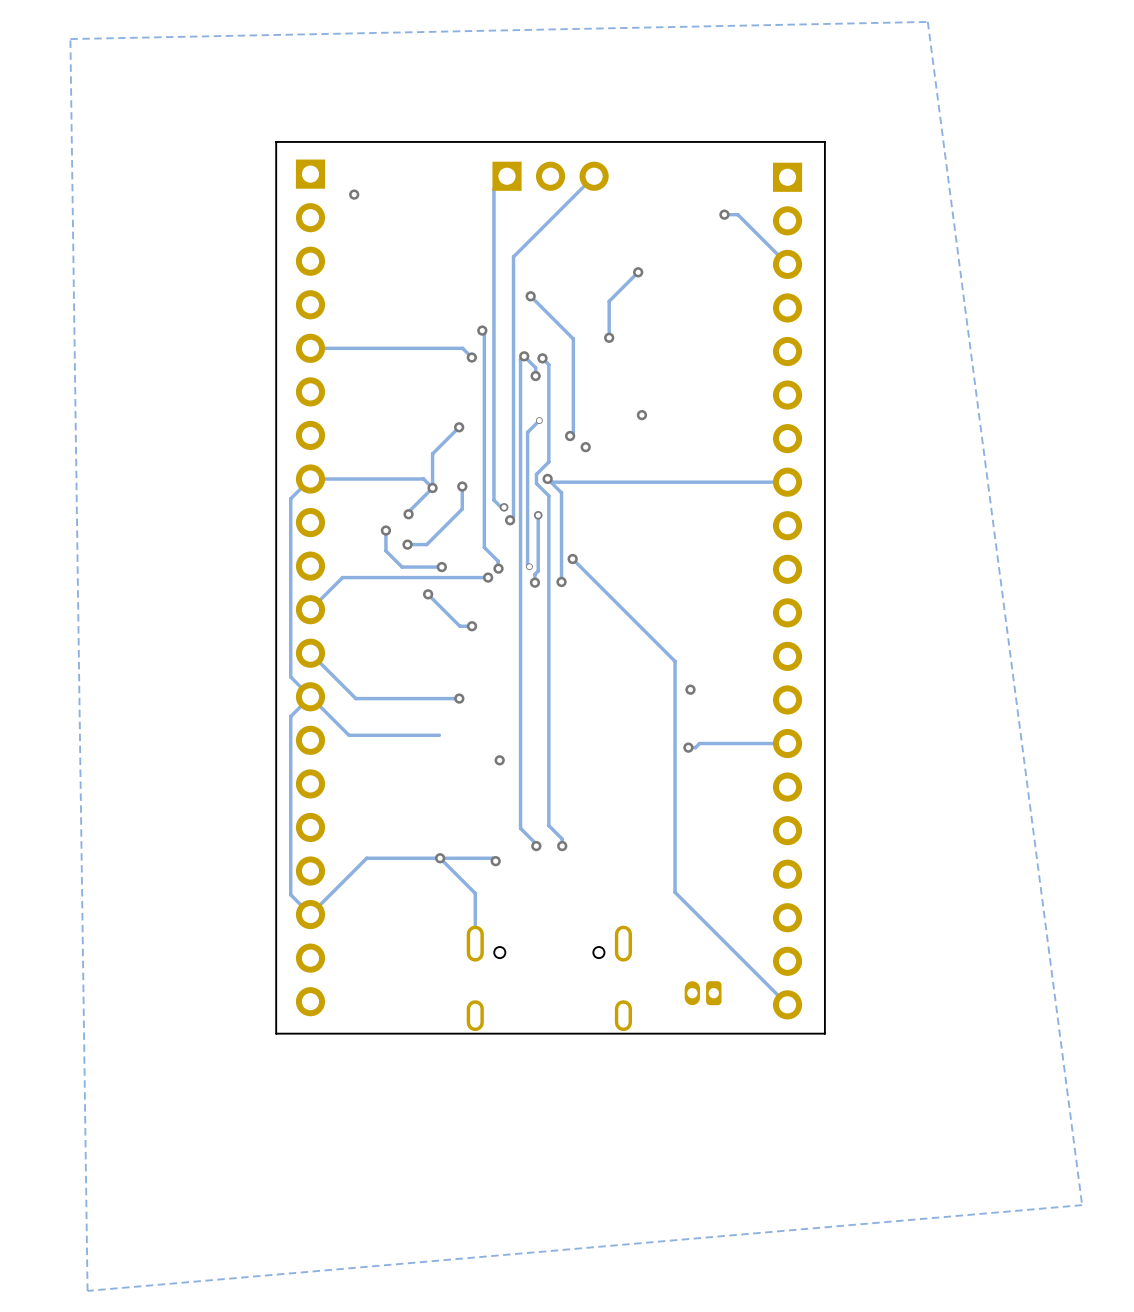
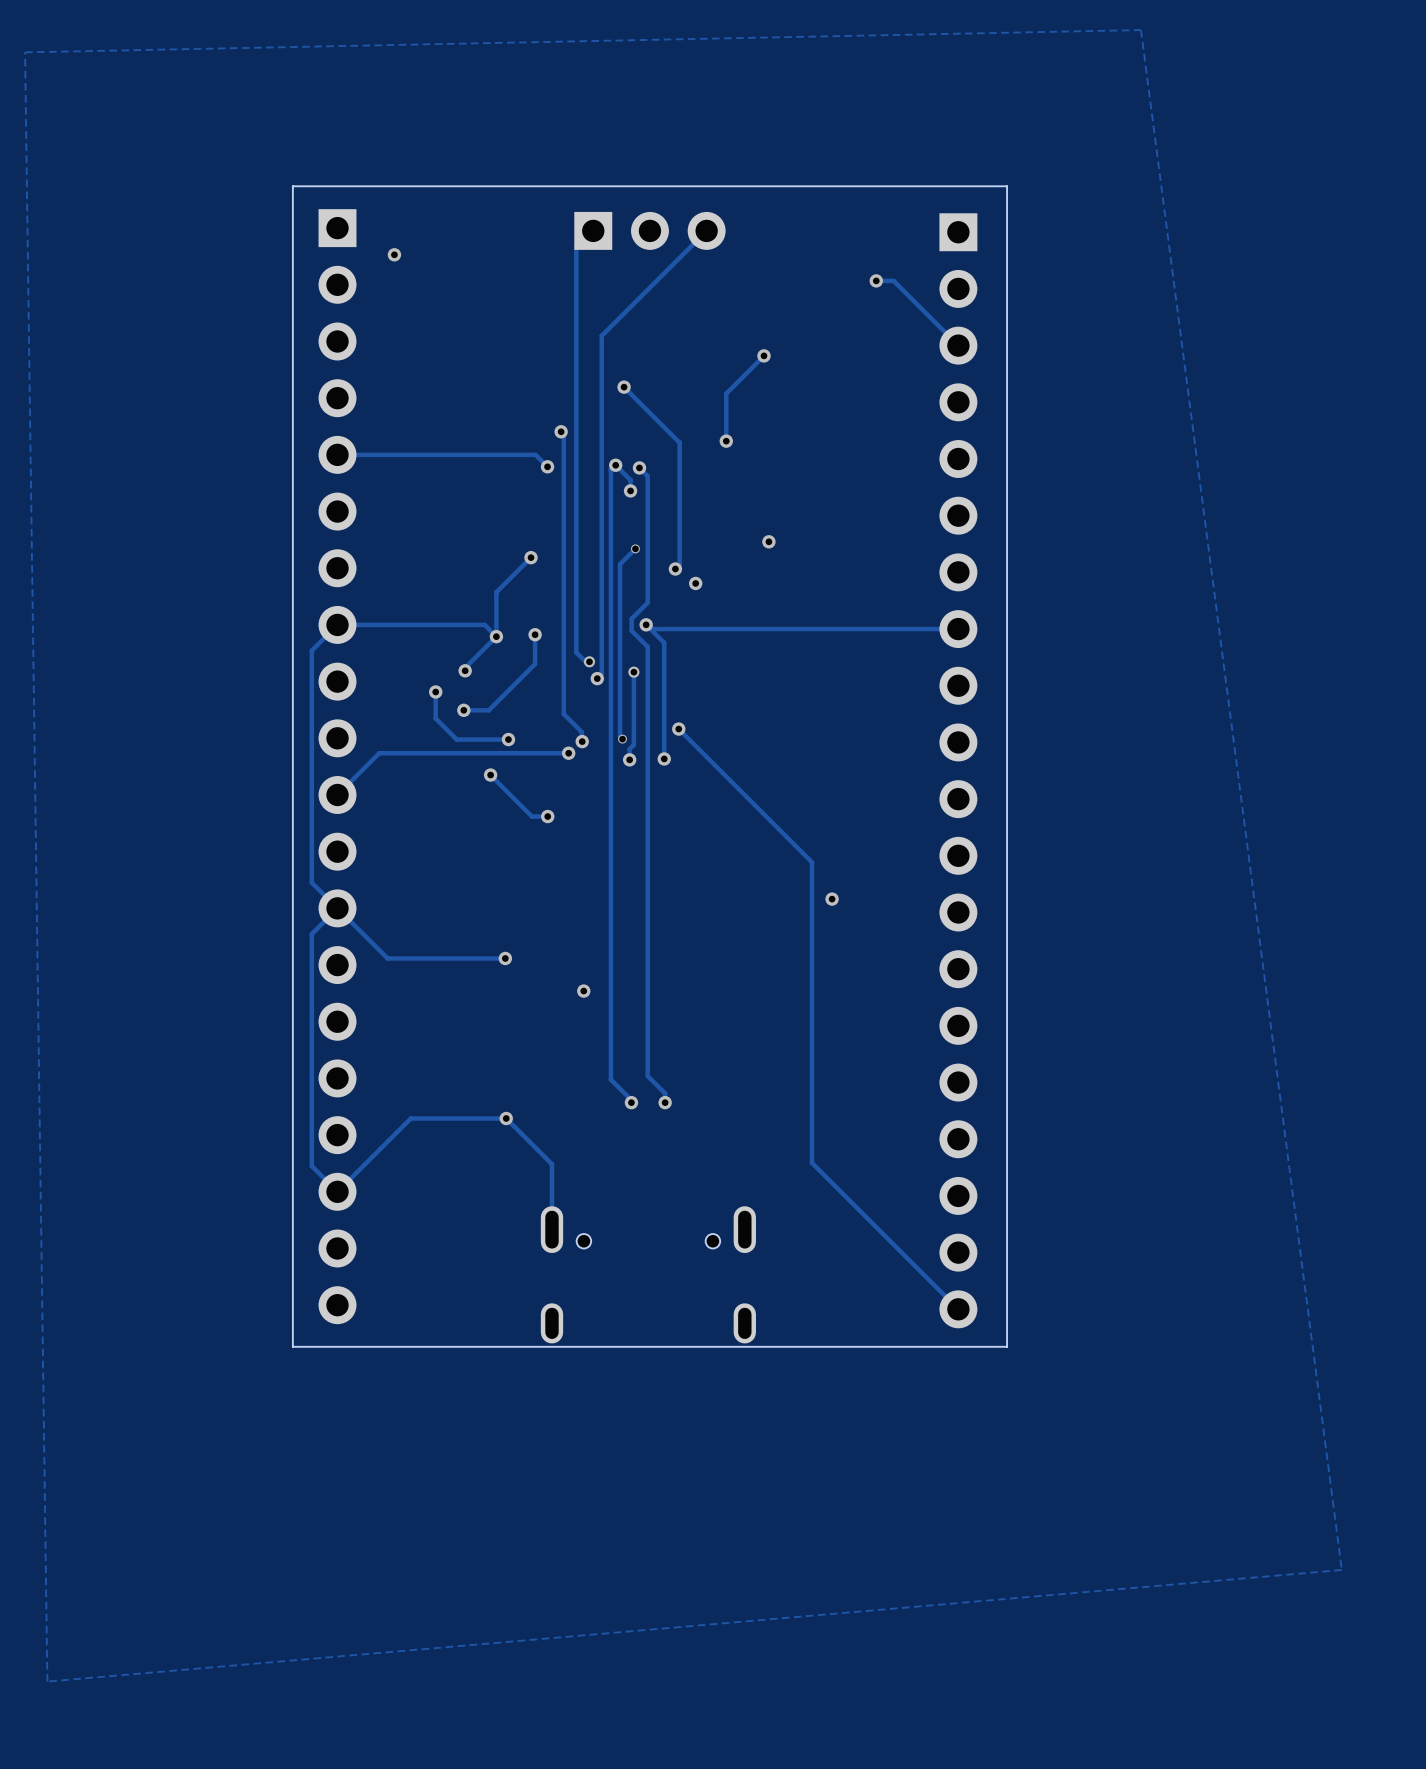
track: (310, 653) (355, 698) (459, 698) -> none
via position: (459, 698) -> (505, 958)
track: (787, 743) (699, 743) (695, 747) (688, 747) -> none
via: (688, 747) -> none
track: (440, 858) (492, 858) (495, 861) -> none
via: (495, 861) -> none
part: (703, 993) -> none

